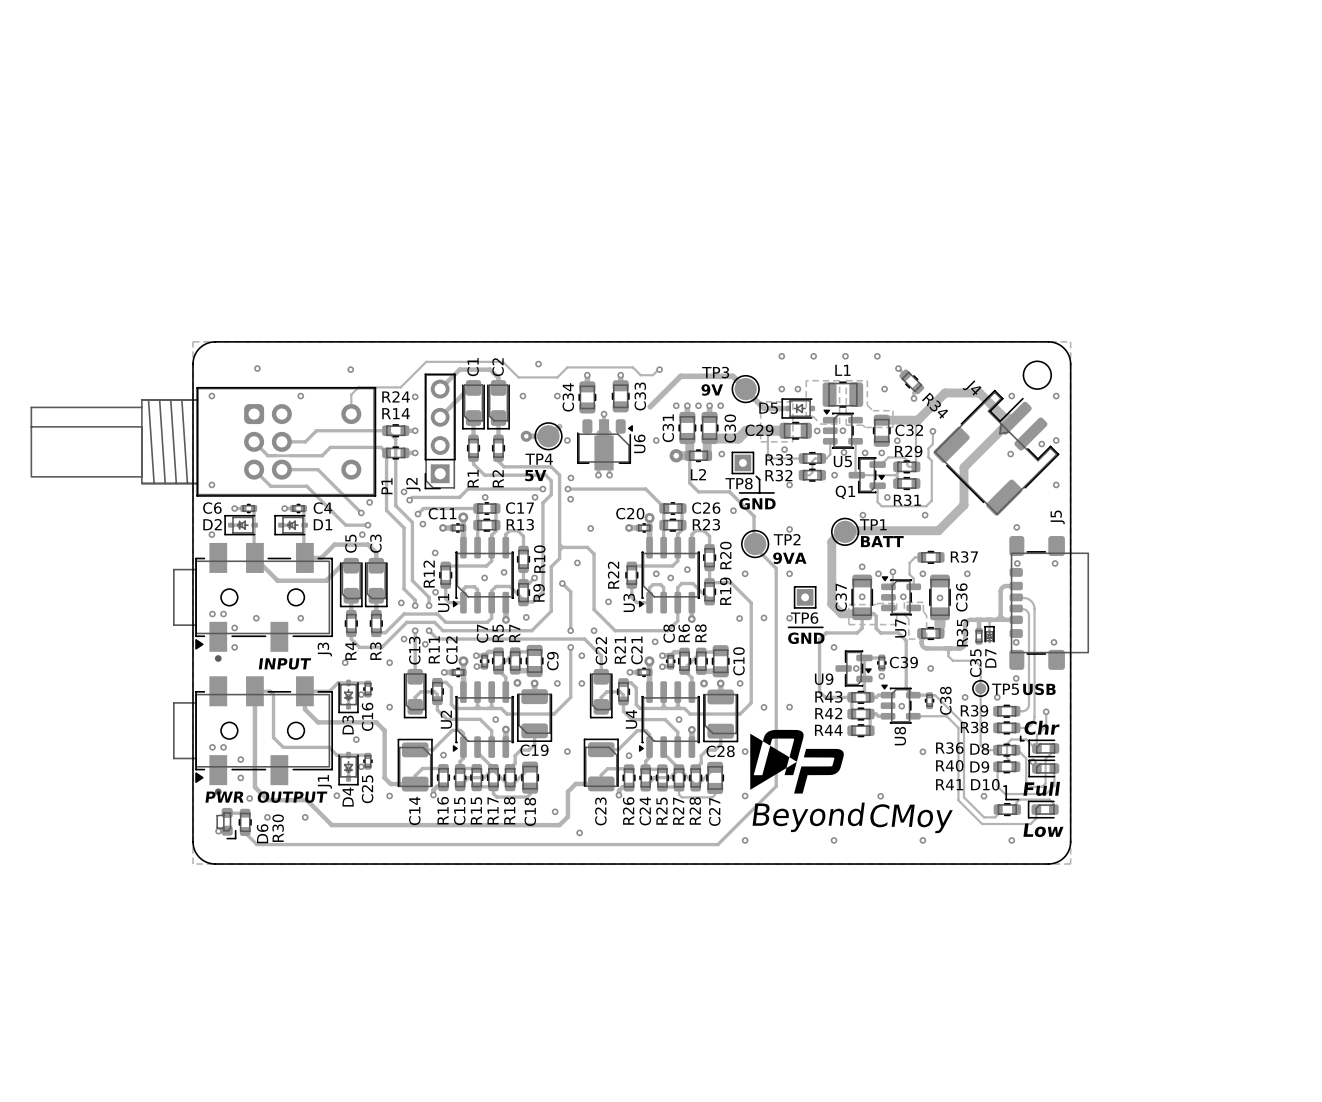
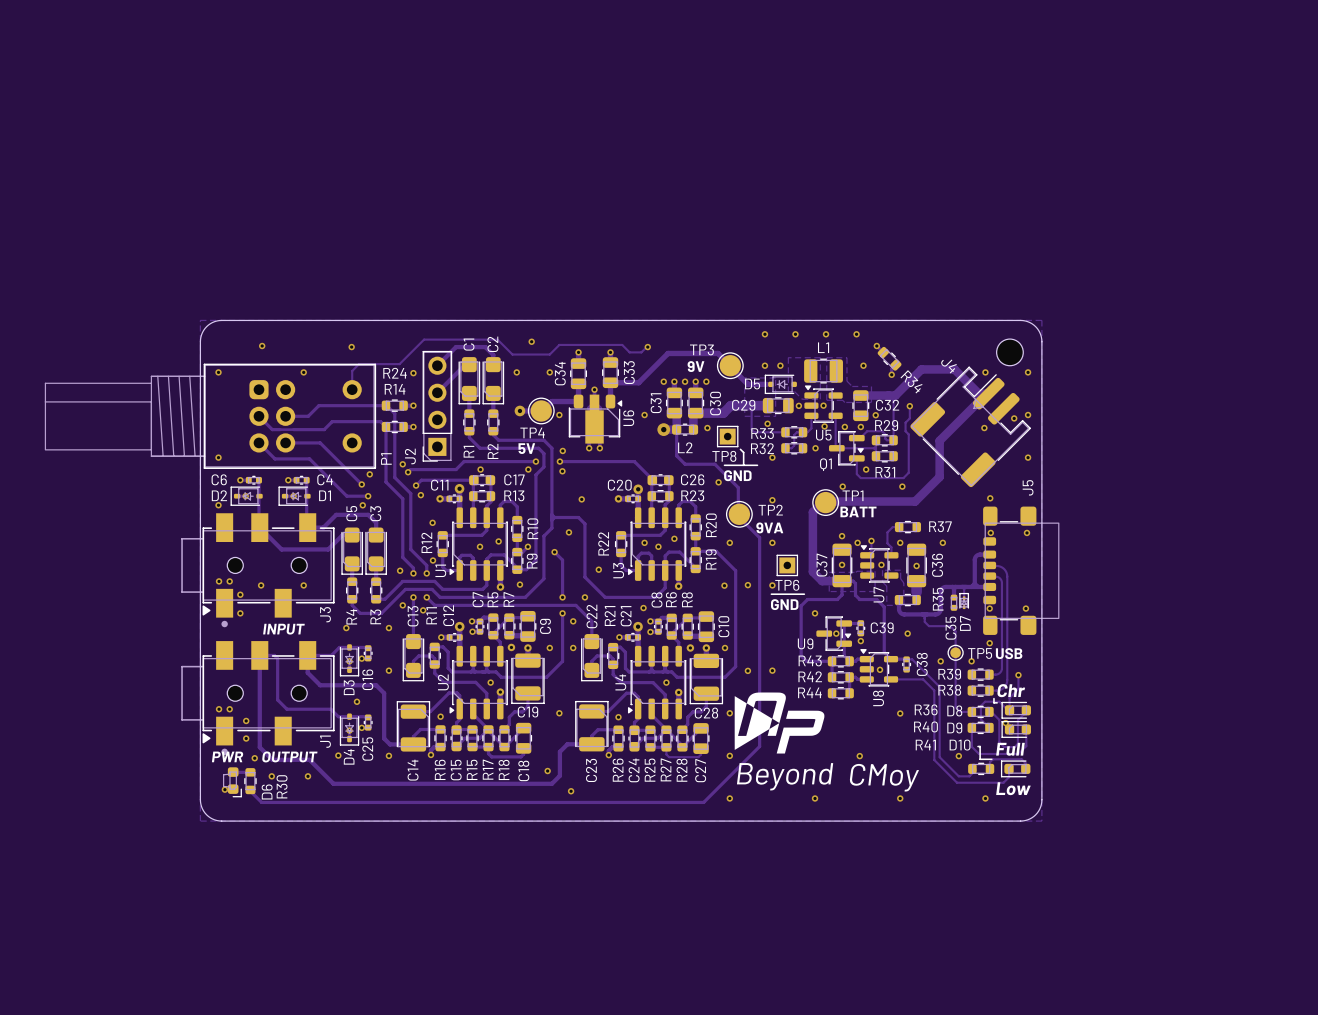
track: none -> (638, 382) (610, 382) (610, 401)
track: none -> (578, 383) (578, 401) (552, 401)

